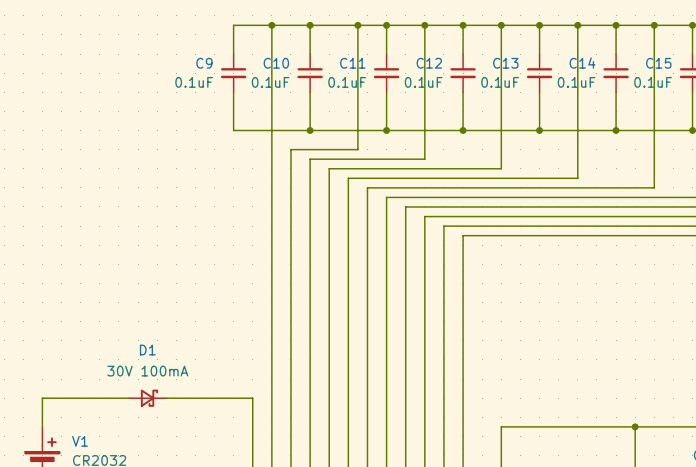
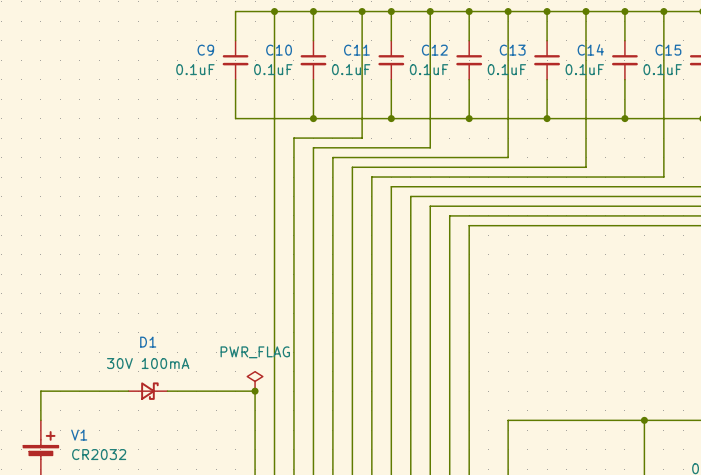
power symbol: none -> PWR_FLAG (255, 381)
junction: none -> (255, 391)

